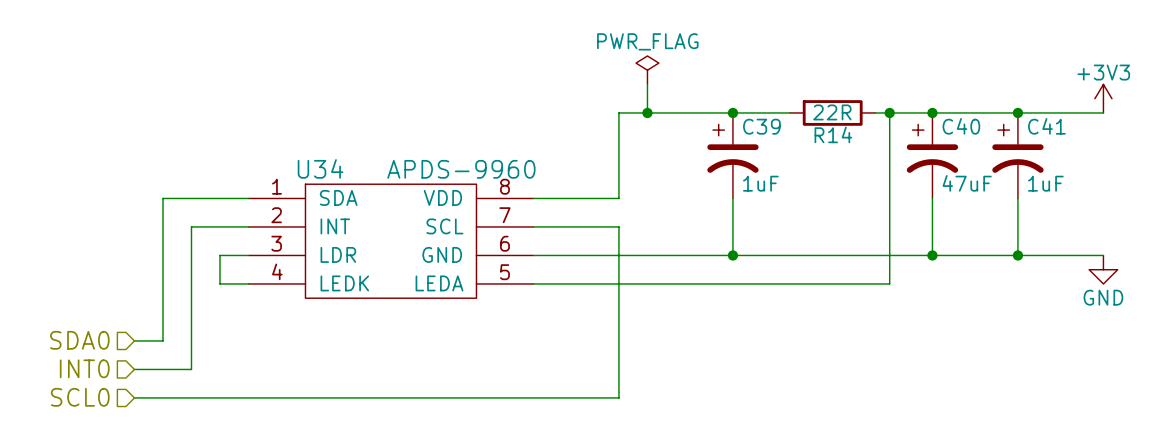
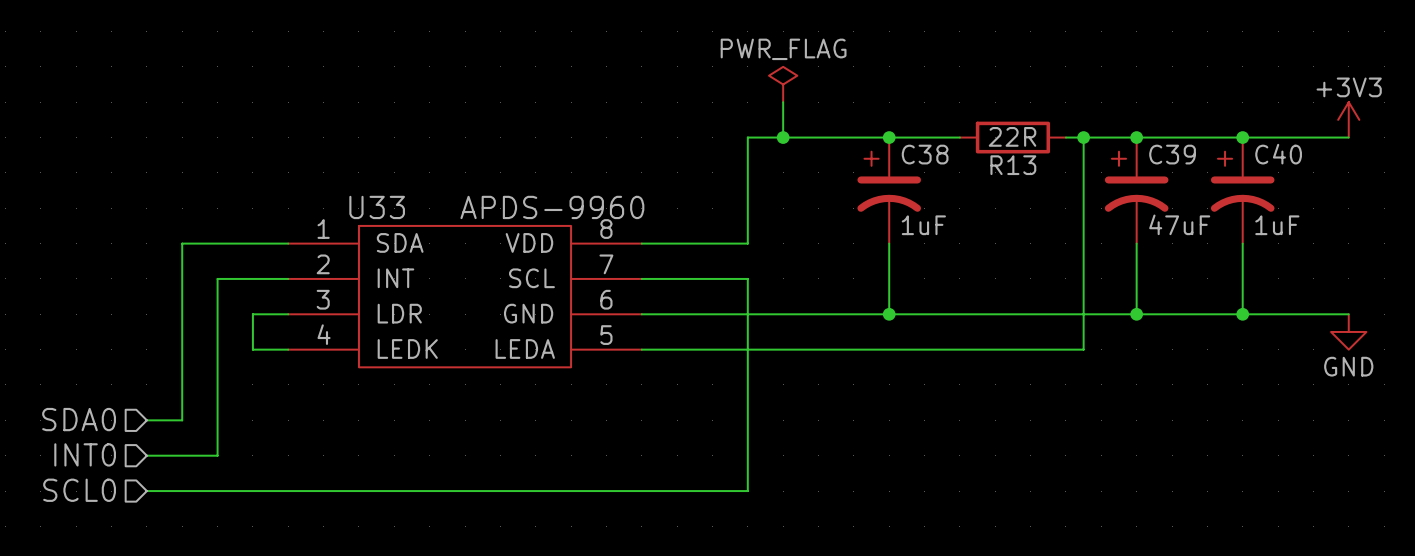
C39 name: C39 (761, 126) -> C38 (925, 154)
C40 name: C40 (961, 126) -> C39 (1172, 154)
C41 name: C41 (1046, 126) -> C40 (1278, 154)
R14 name: R14 (833, 134) -> R13 (1013, 165)
U34 name: U34 (320, 168) -> U33 (377, 207)

